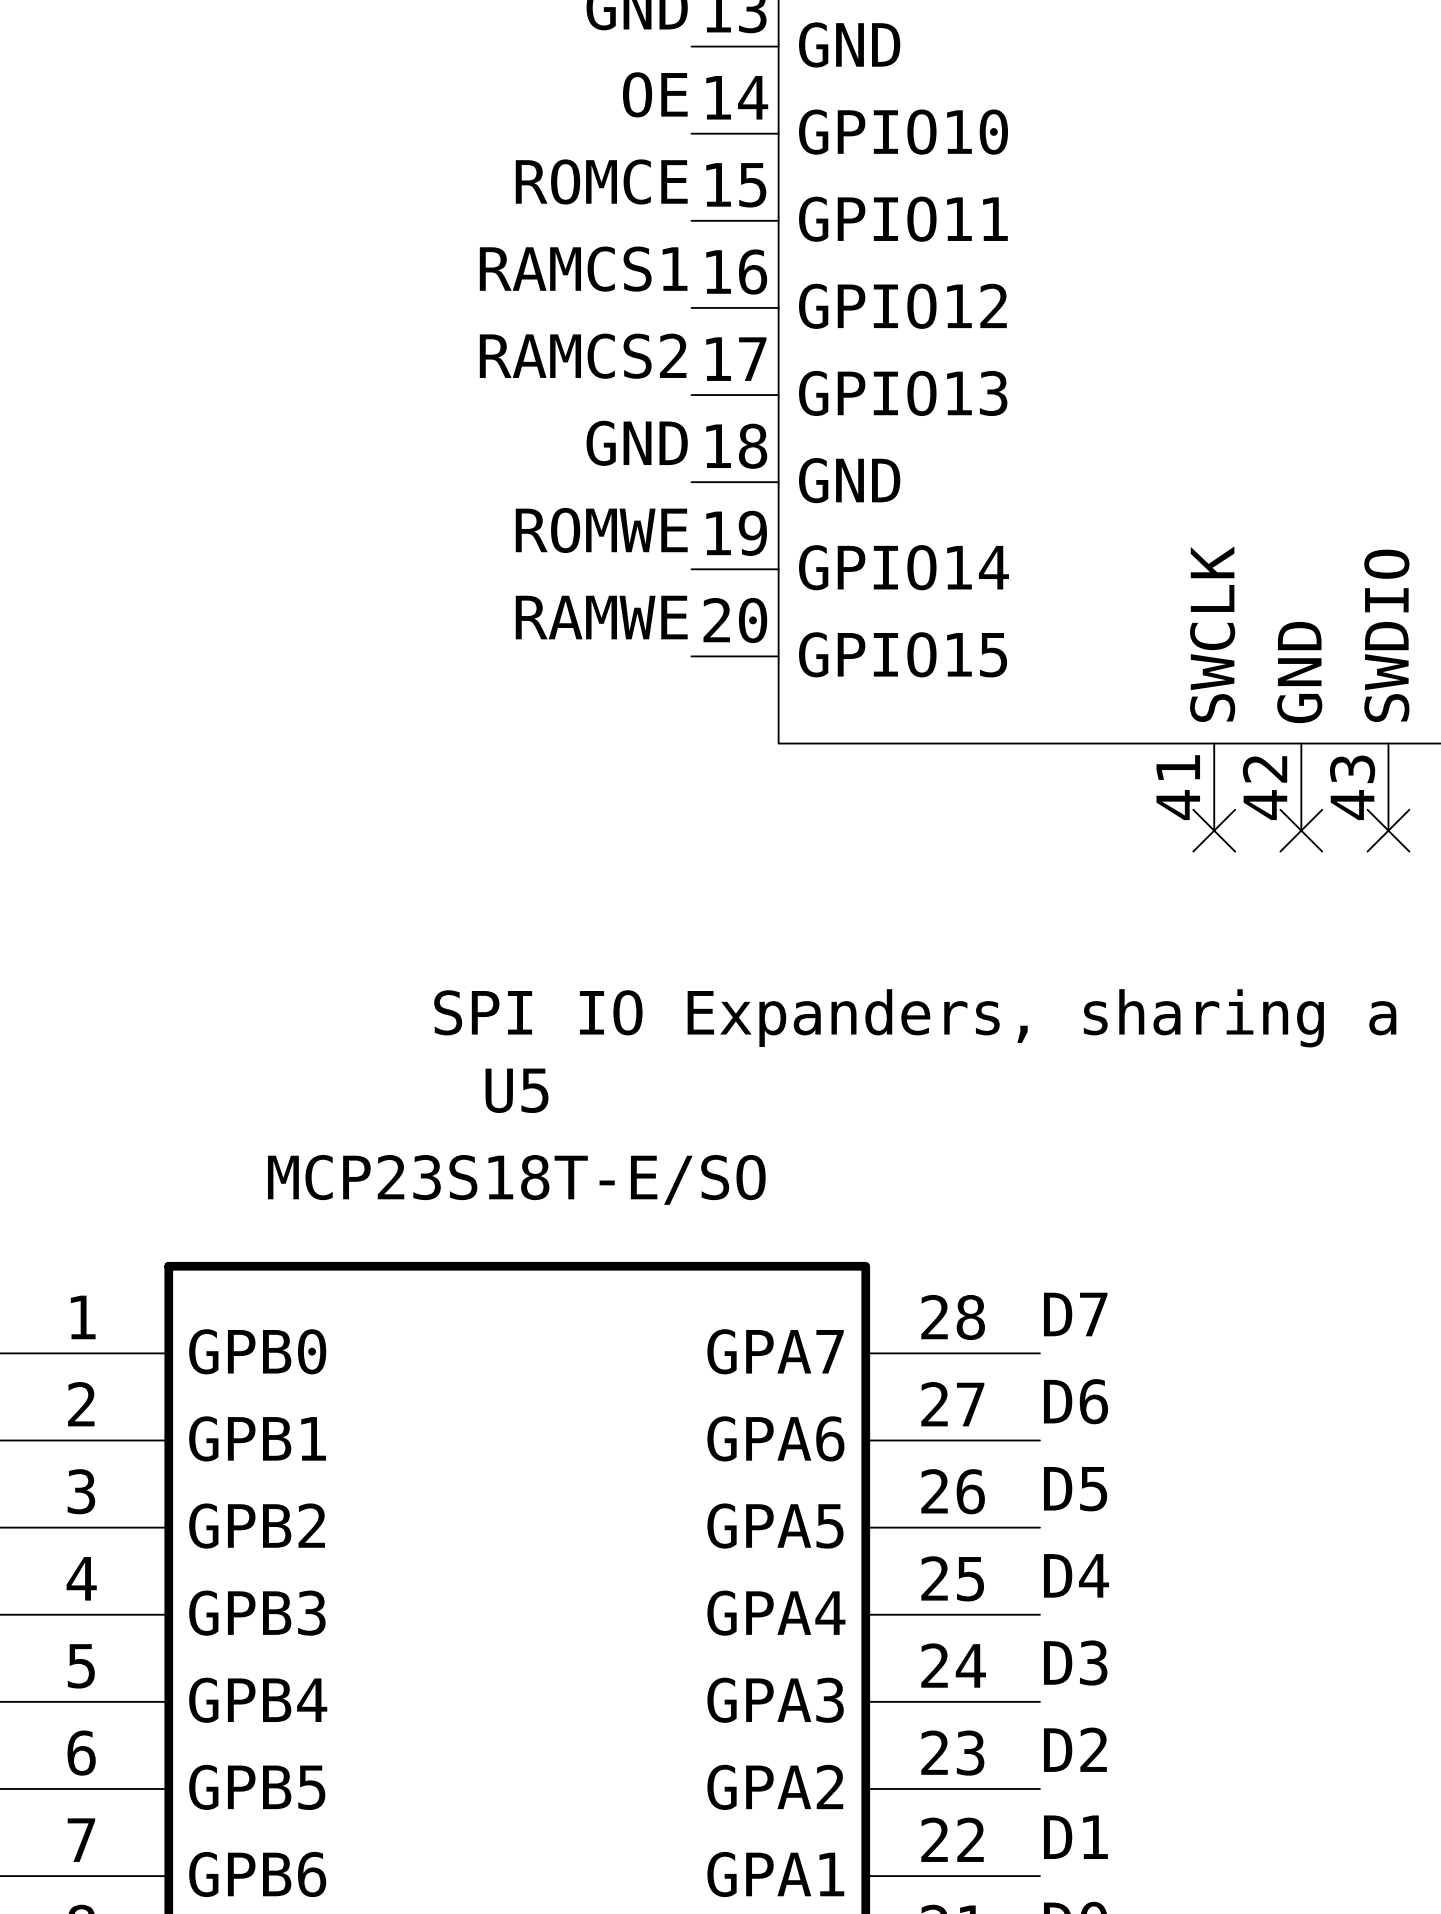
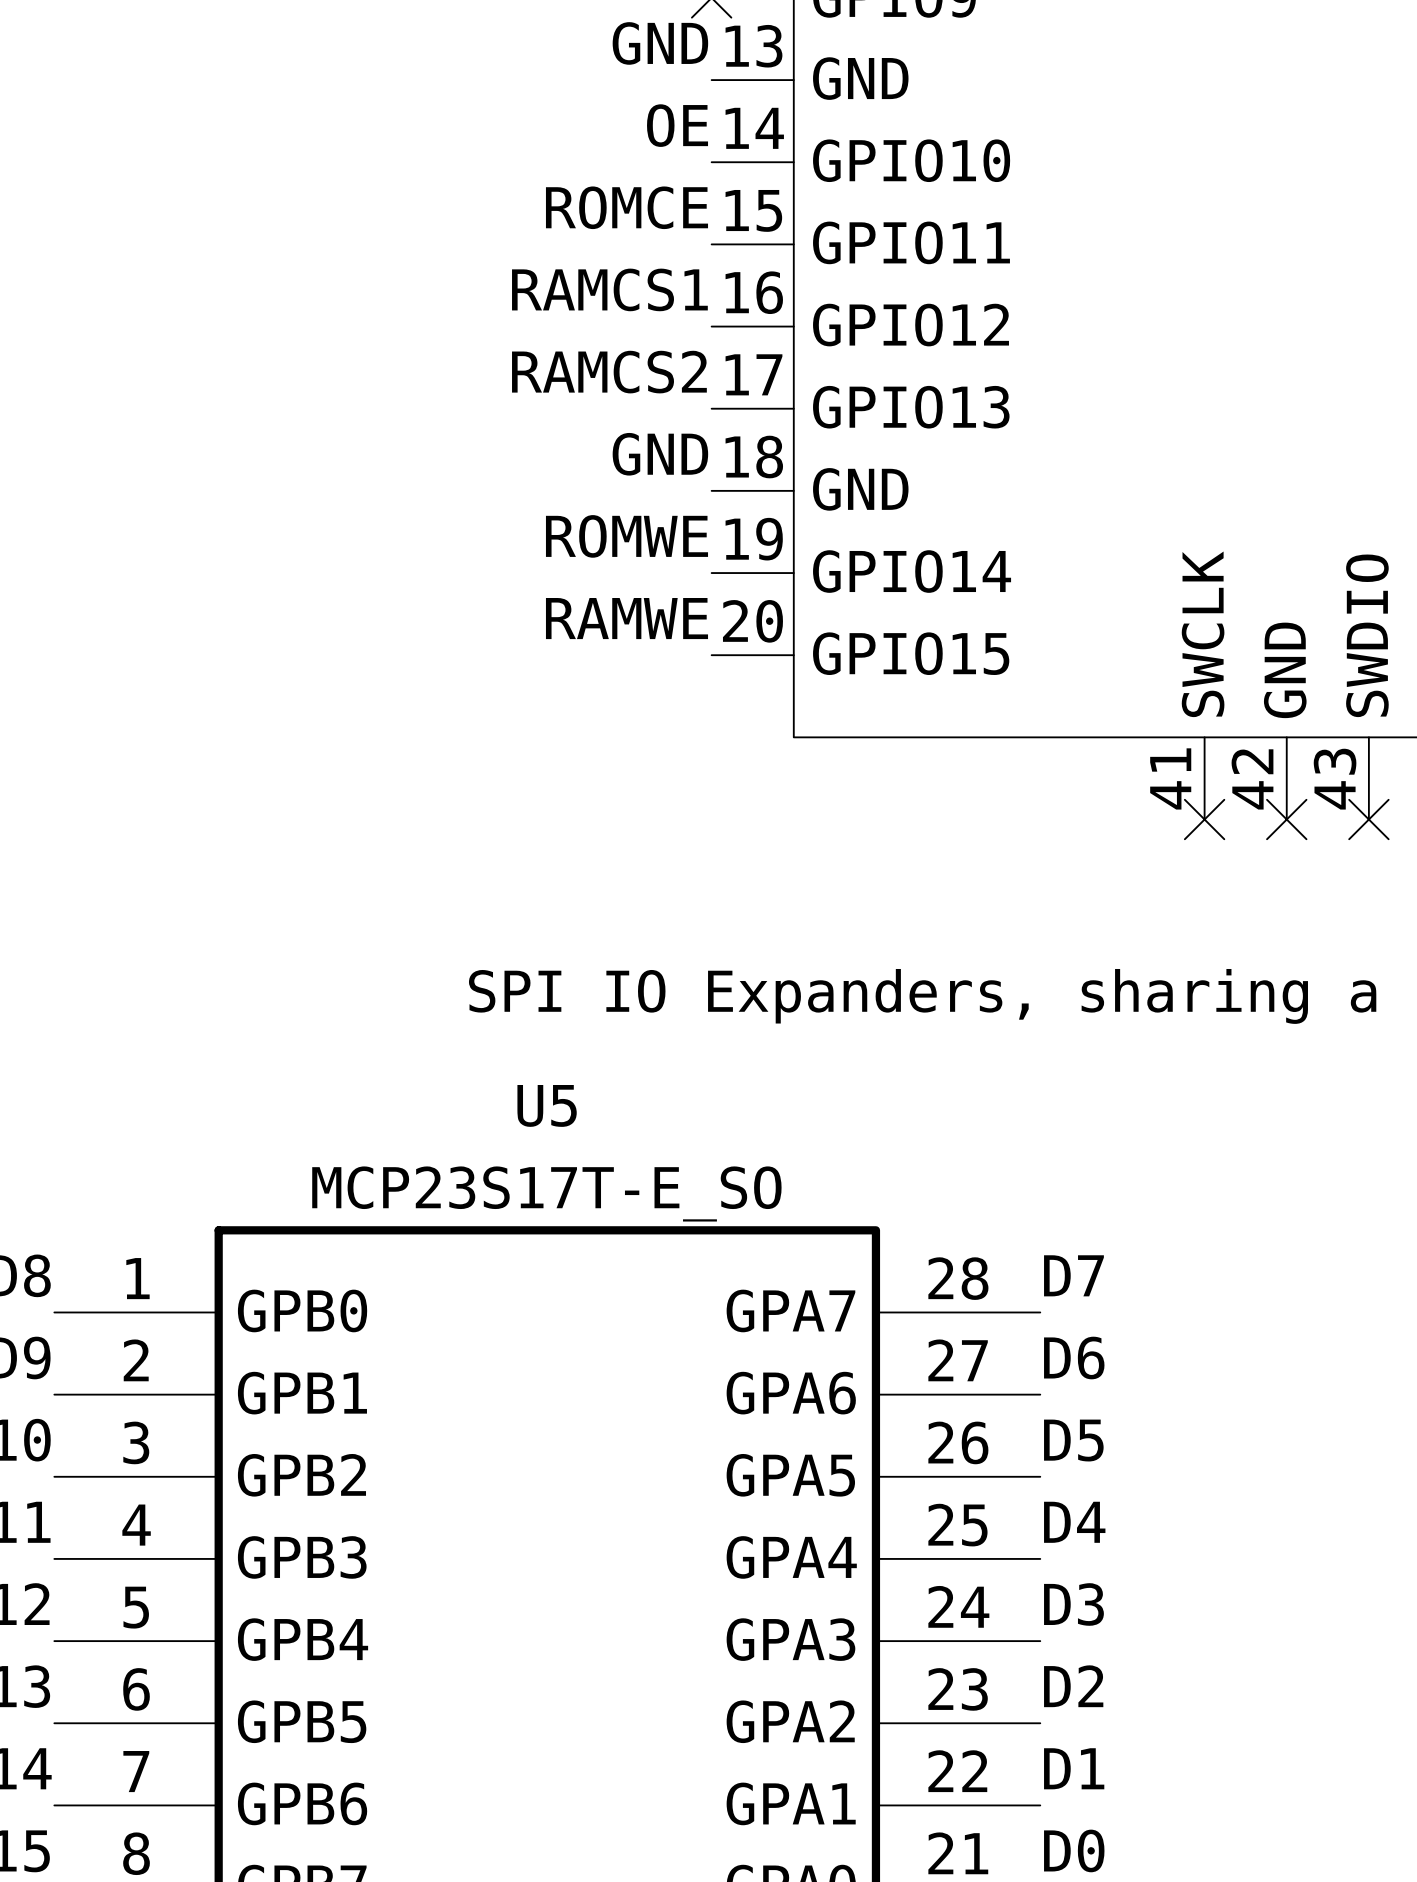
U5 name position: U5 (517, 1090) -> U5 (547, 1105)
U5 value: MCP23S18T-E/SO (516, 1179) -> MCP23S17T-E_SO (546, 1193)

